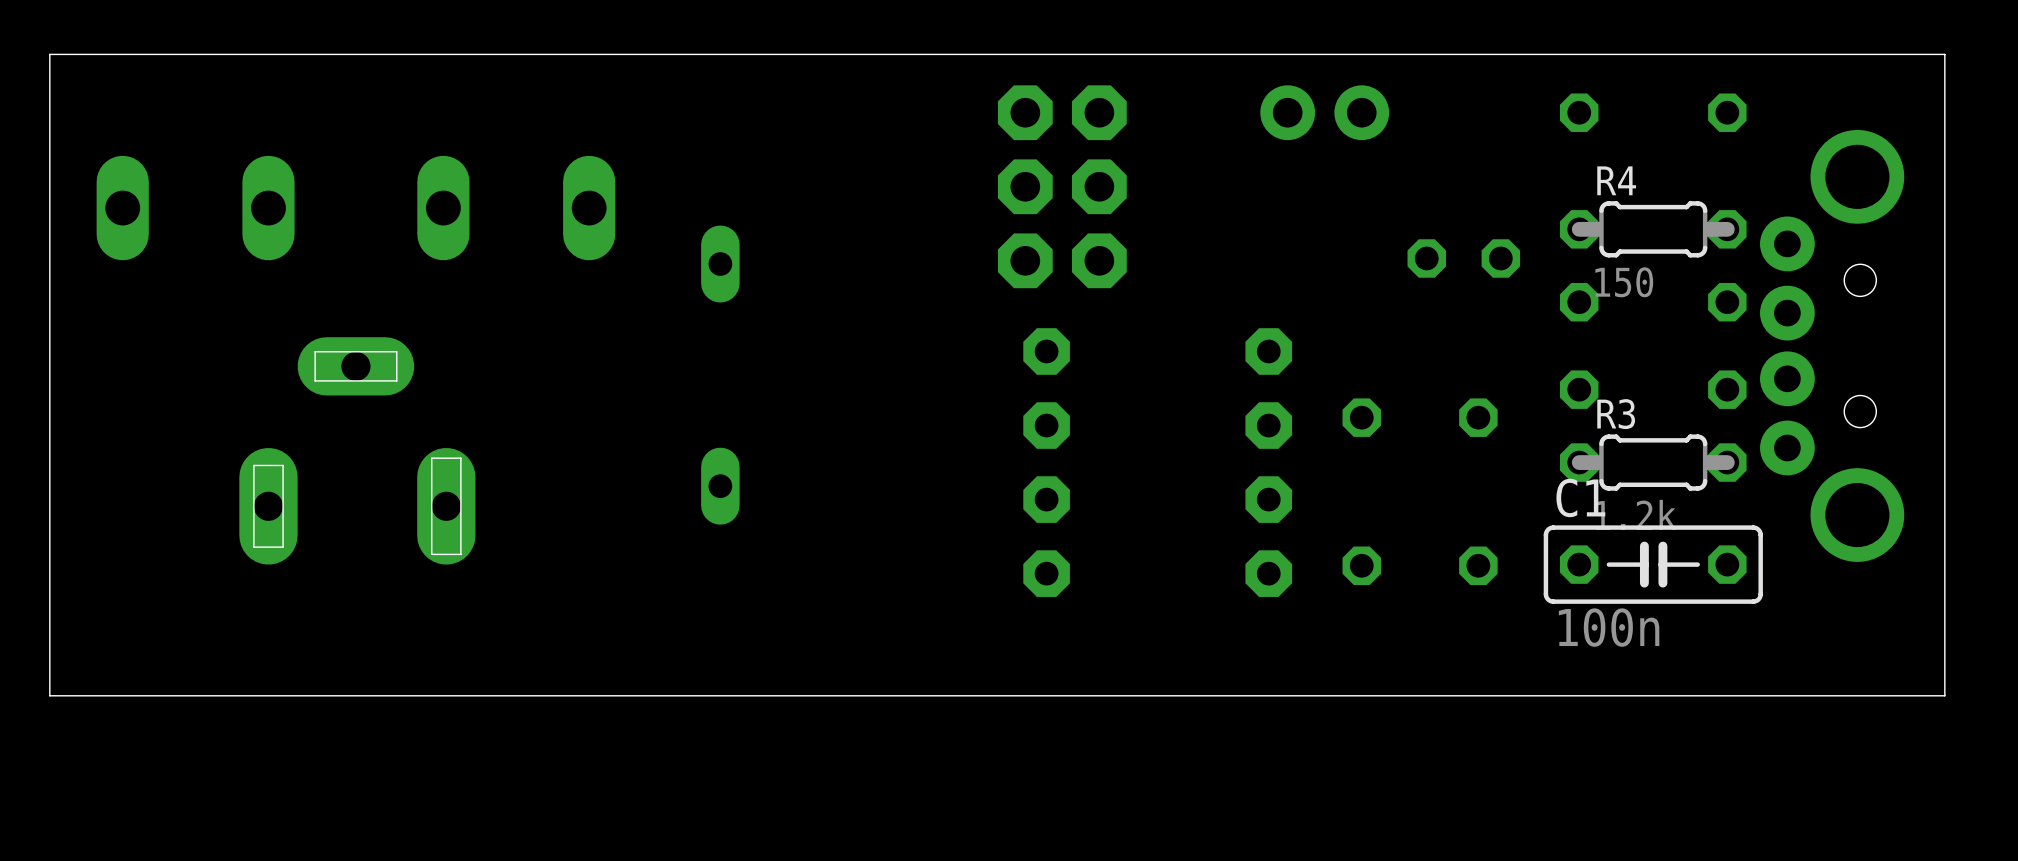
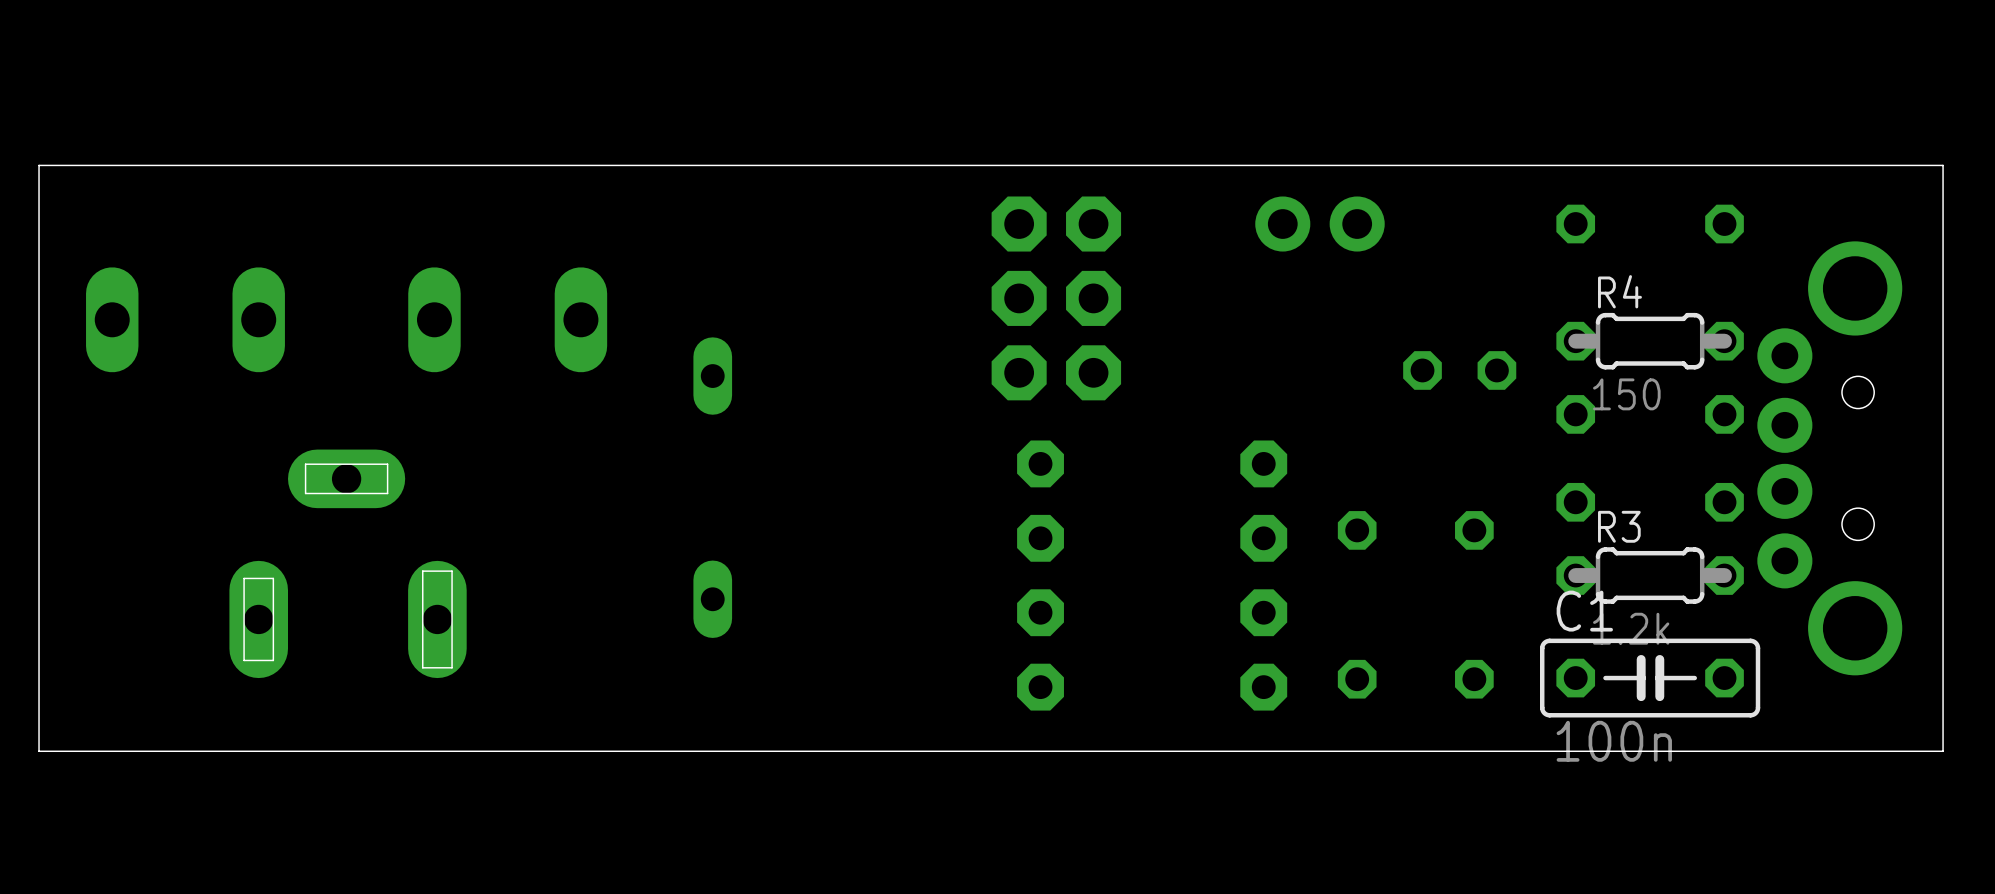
board edge: (1944, 637) (1944, 695) (49, 695) (49, 637) -> (1943, 751) (39, 751)

